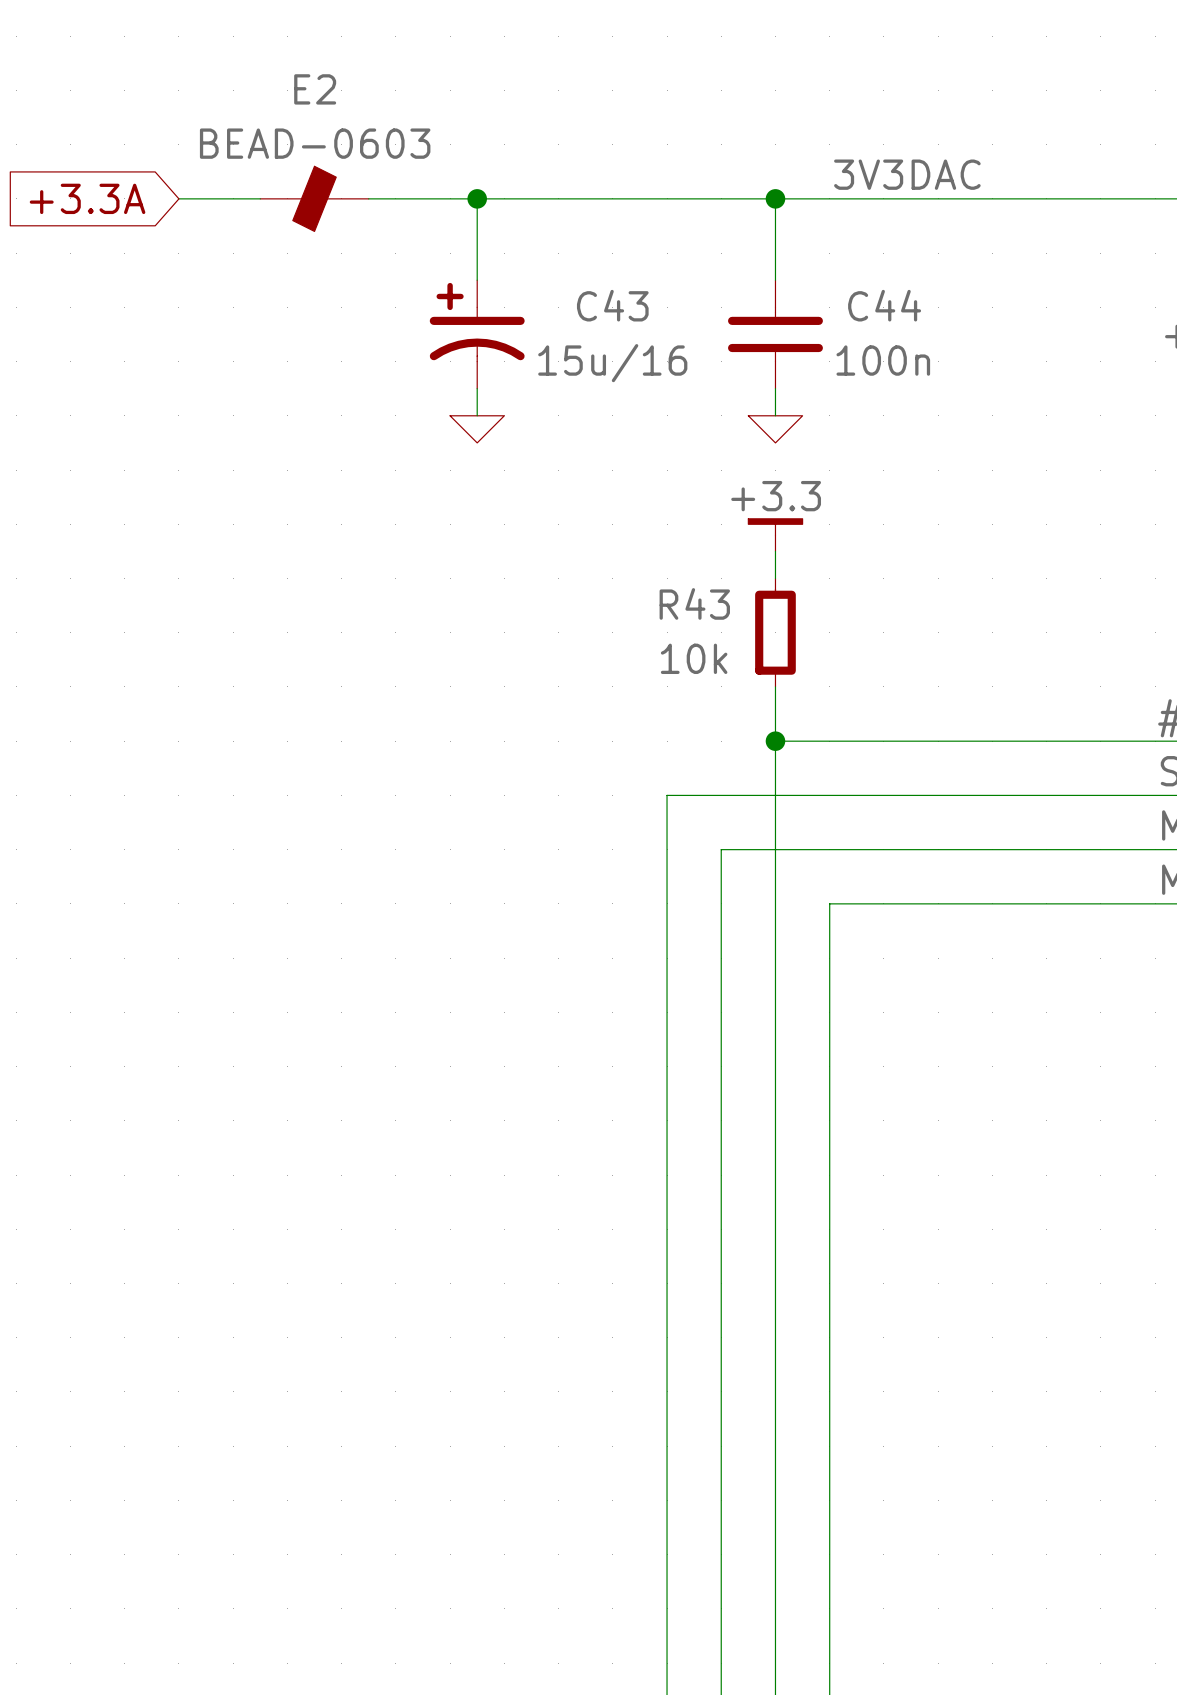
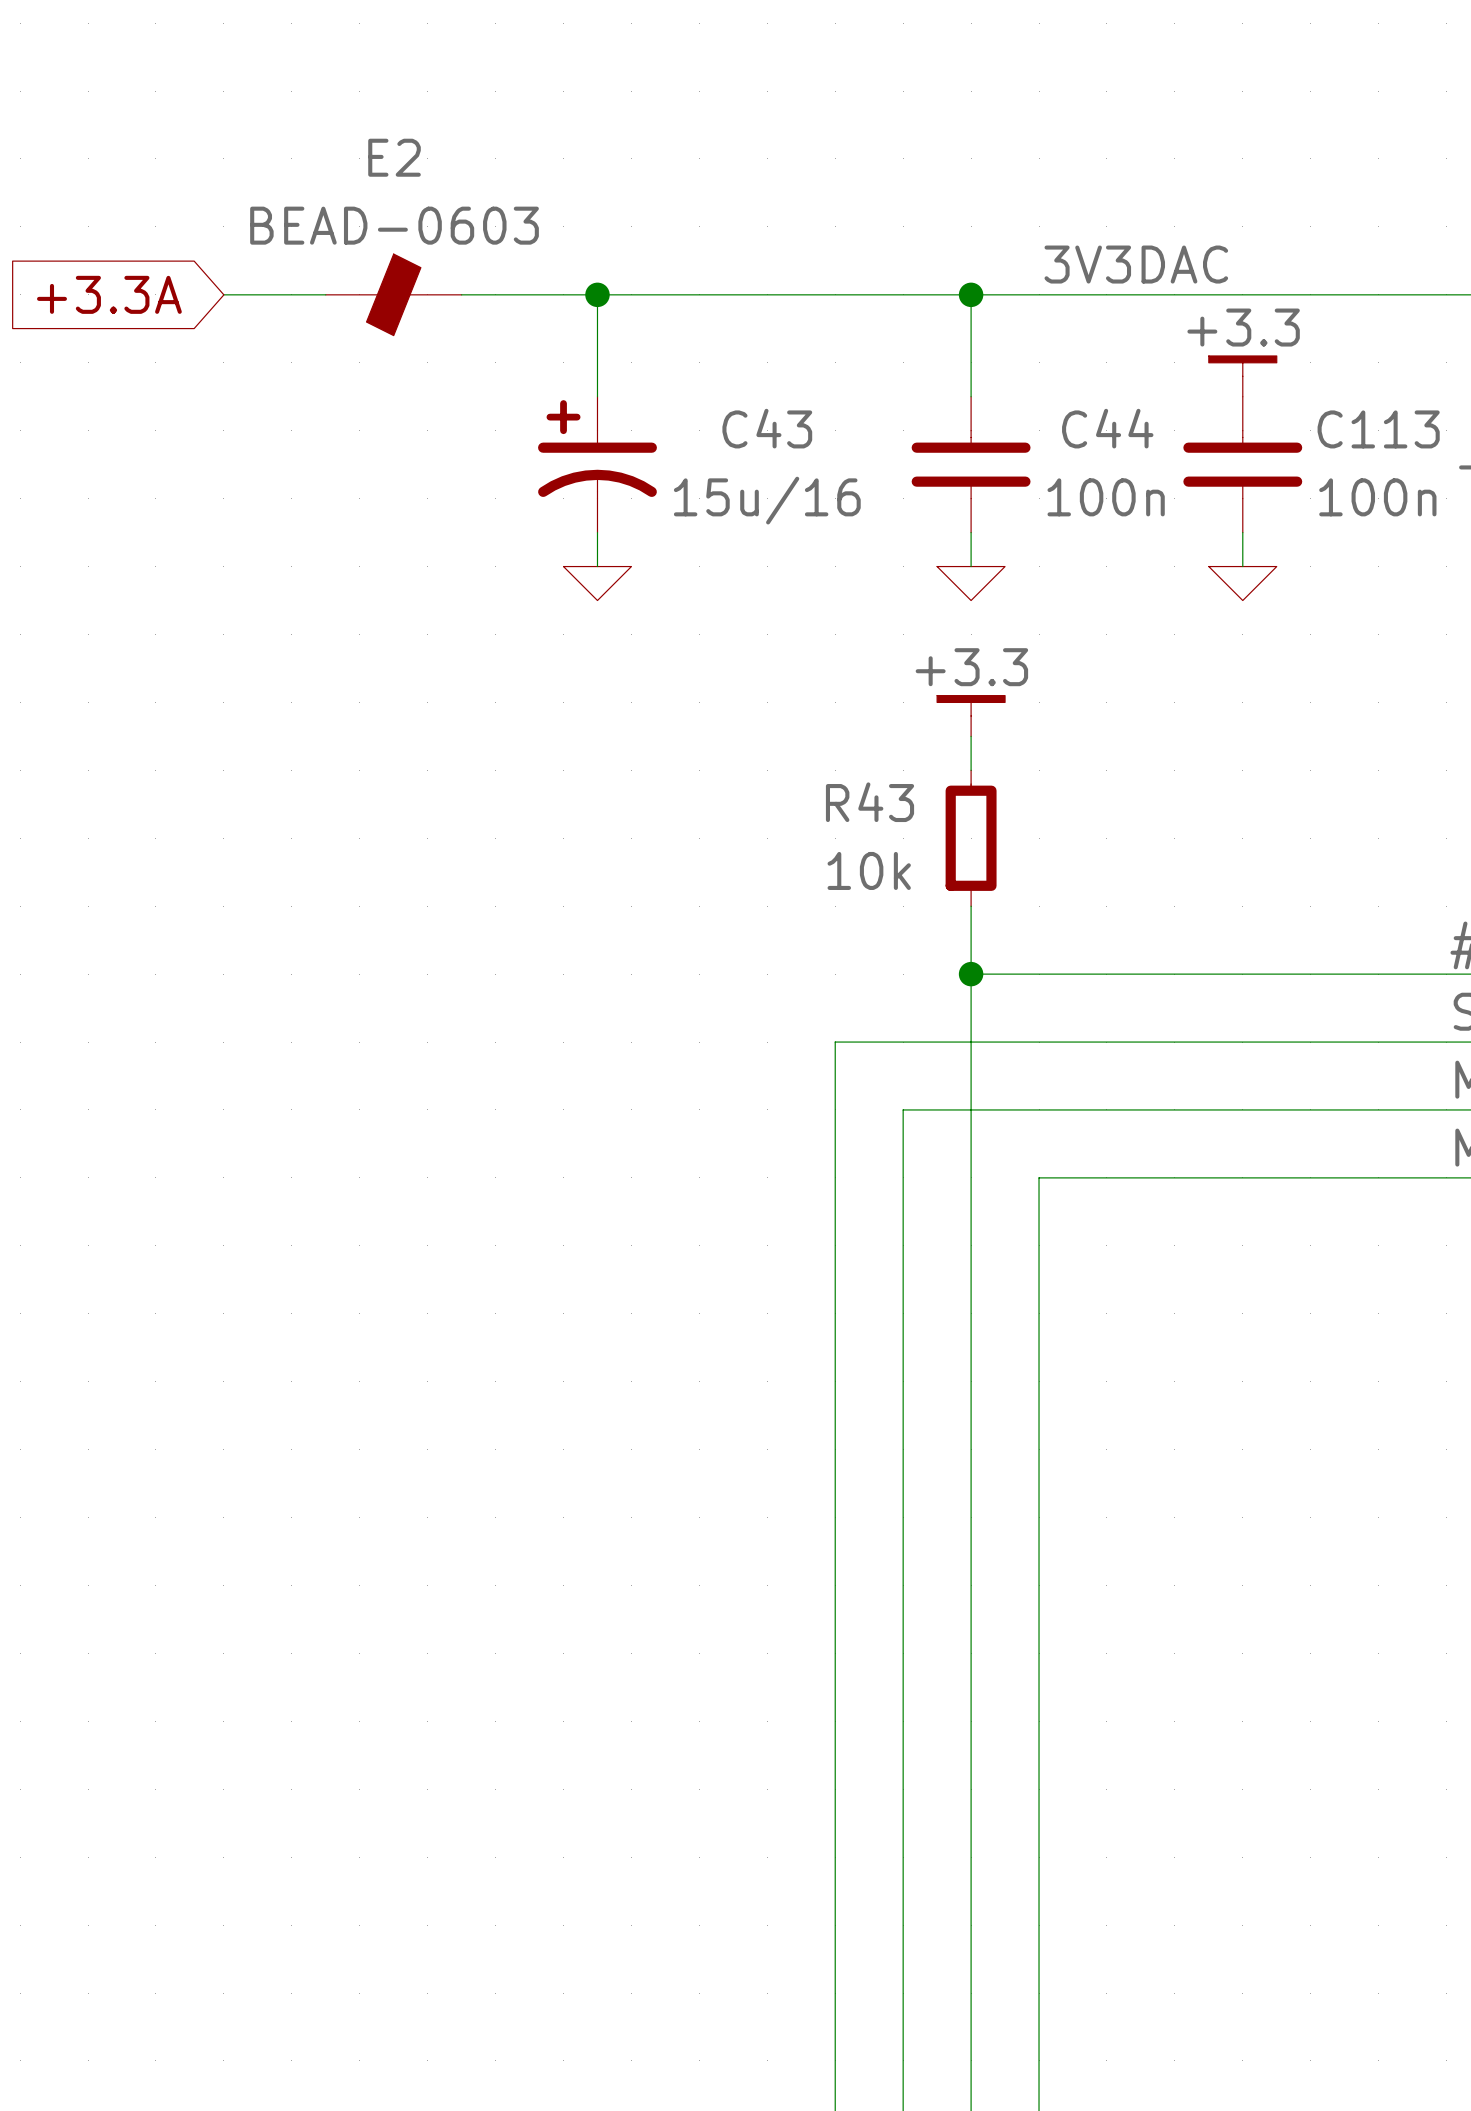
power symbol: none -> +3.3 (1242, 376)
C113: none -> 100n (1242, 464)
wire: none -> (1242, 532) (1242, 566)
power symbol: none -> (1242, 583)

